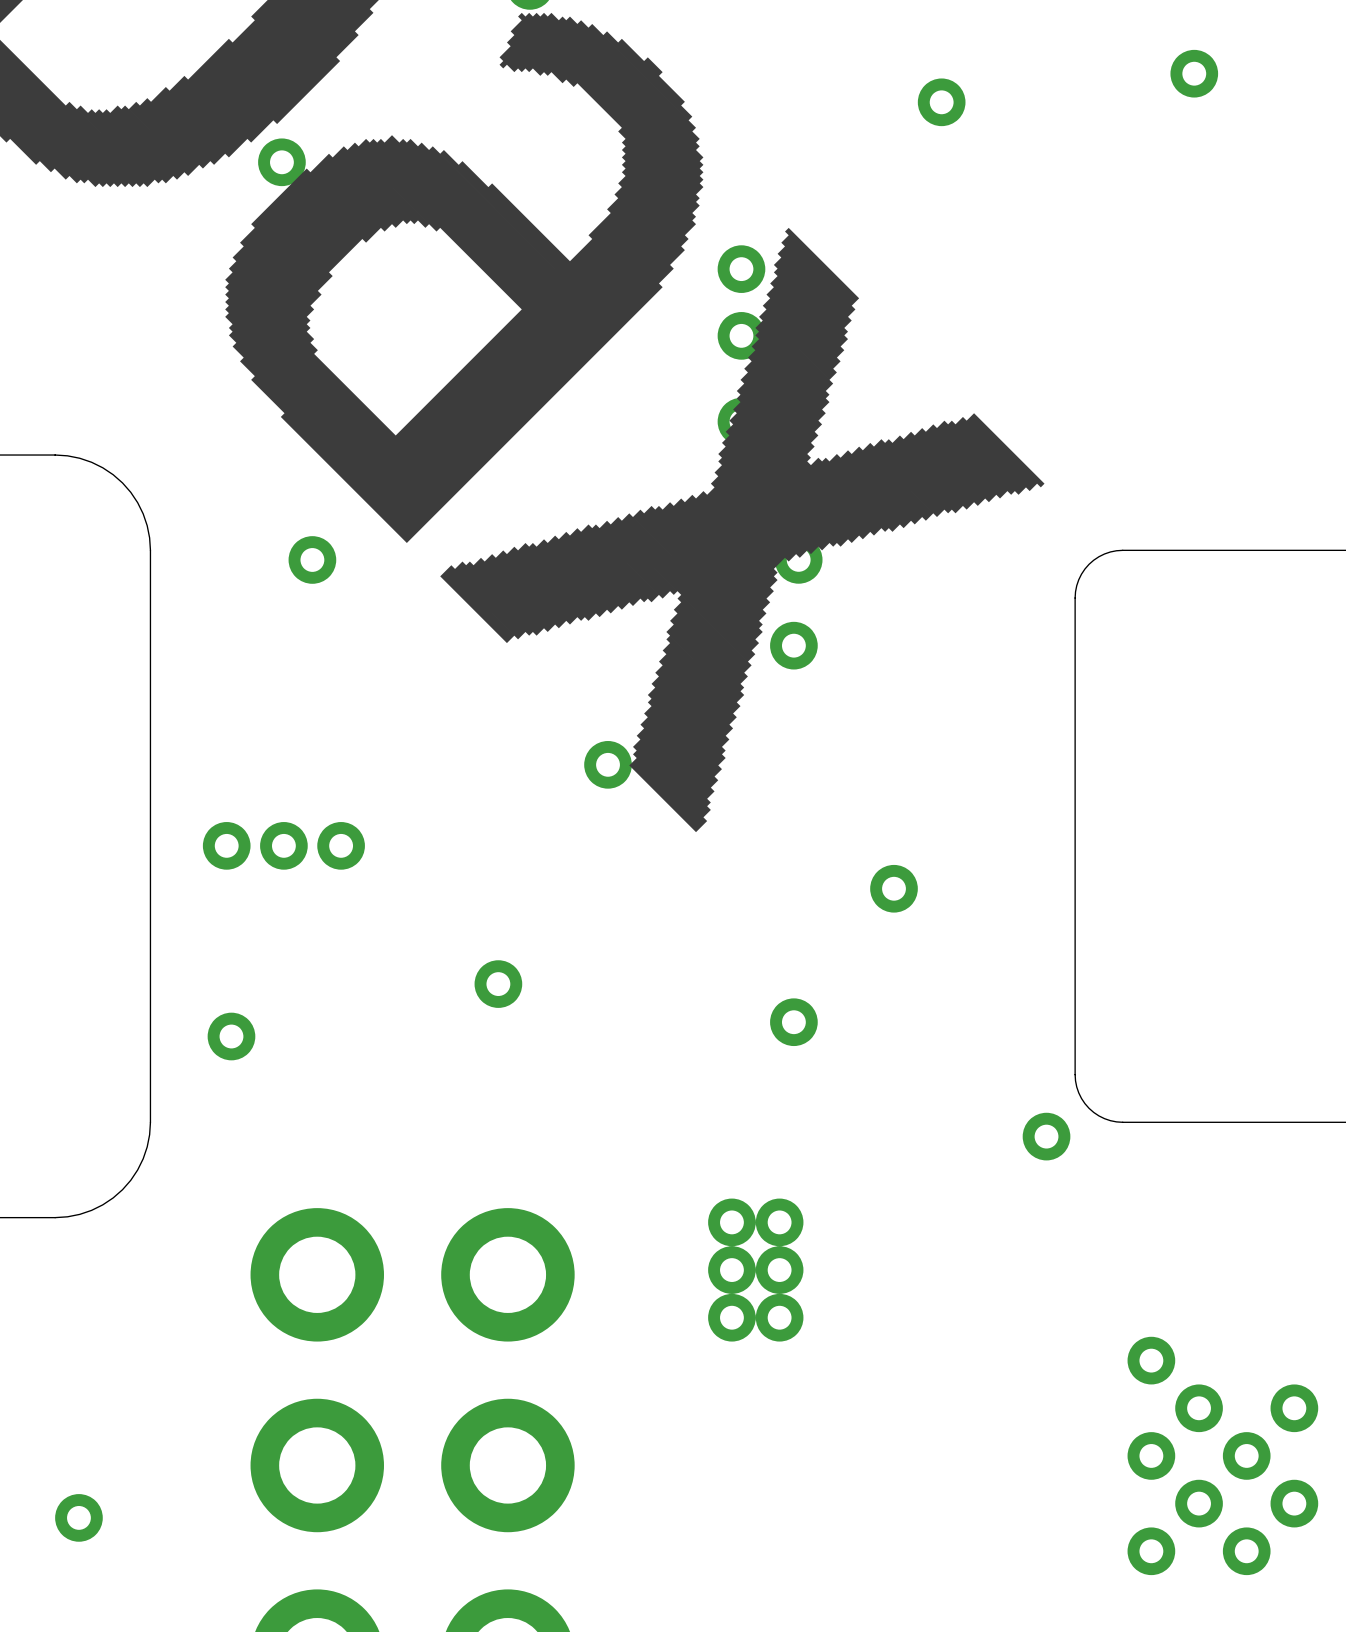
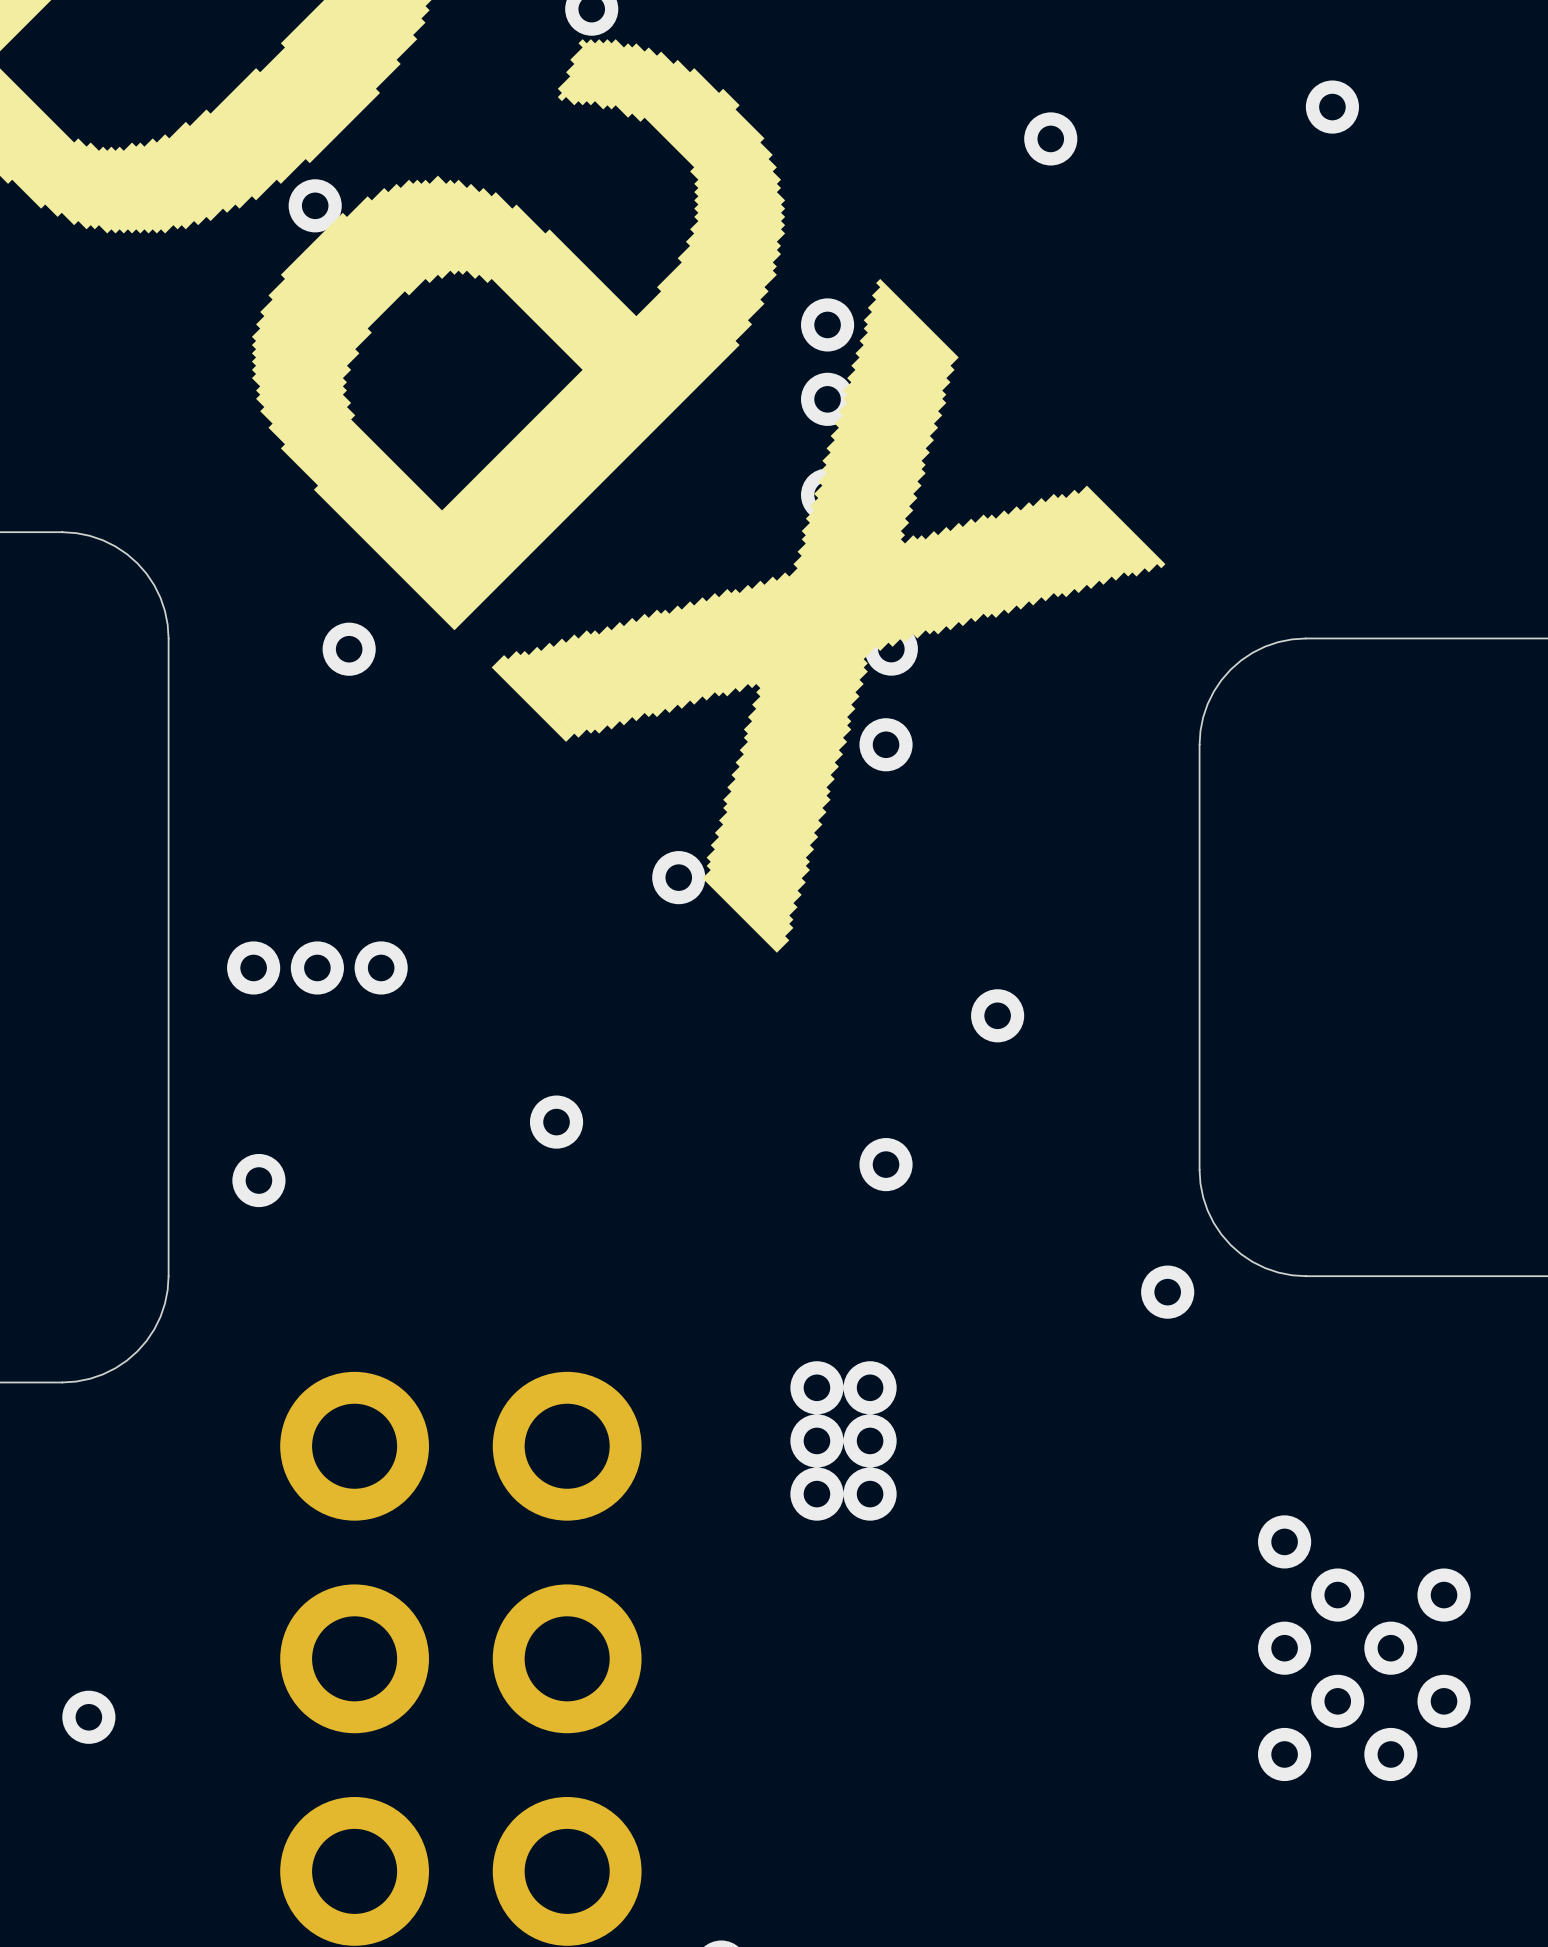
board edge: (1170, 550) (1116, 550) (1098, 556) (1089, 564) (1081, 574) (1075, 591) (1075, 645) -> (1305, 638) (1278, 642) (1265, 646) (1241, 660) (1230, 669) (1221, 680) (1207, 704) (1203, 717) (1199, 744)
board edge: (1075, 1026) (1075, 1080) (1081, 1098) (1089, 1108) (1098, 1115) (1116, 1121) (1170, 1122) -> (1199, 1169) (1203, 1197) (1207, 1210) (1221, 1234) (1230, 1245) (1241, 1254) (1265, 1268) (1278, 1272) (1305, 1276)

